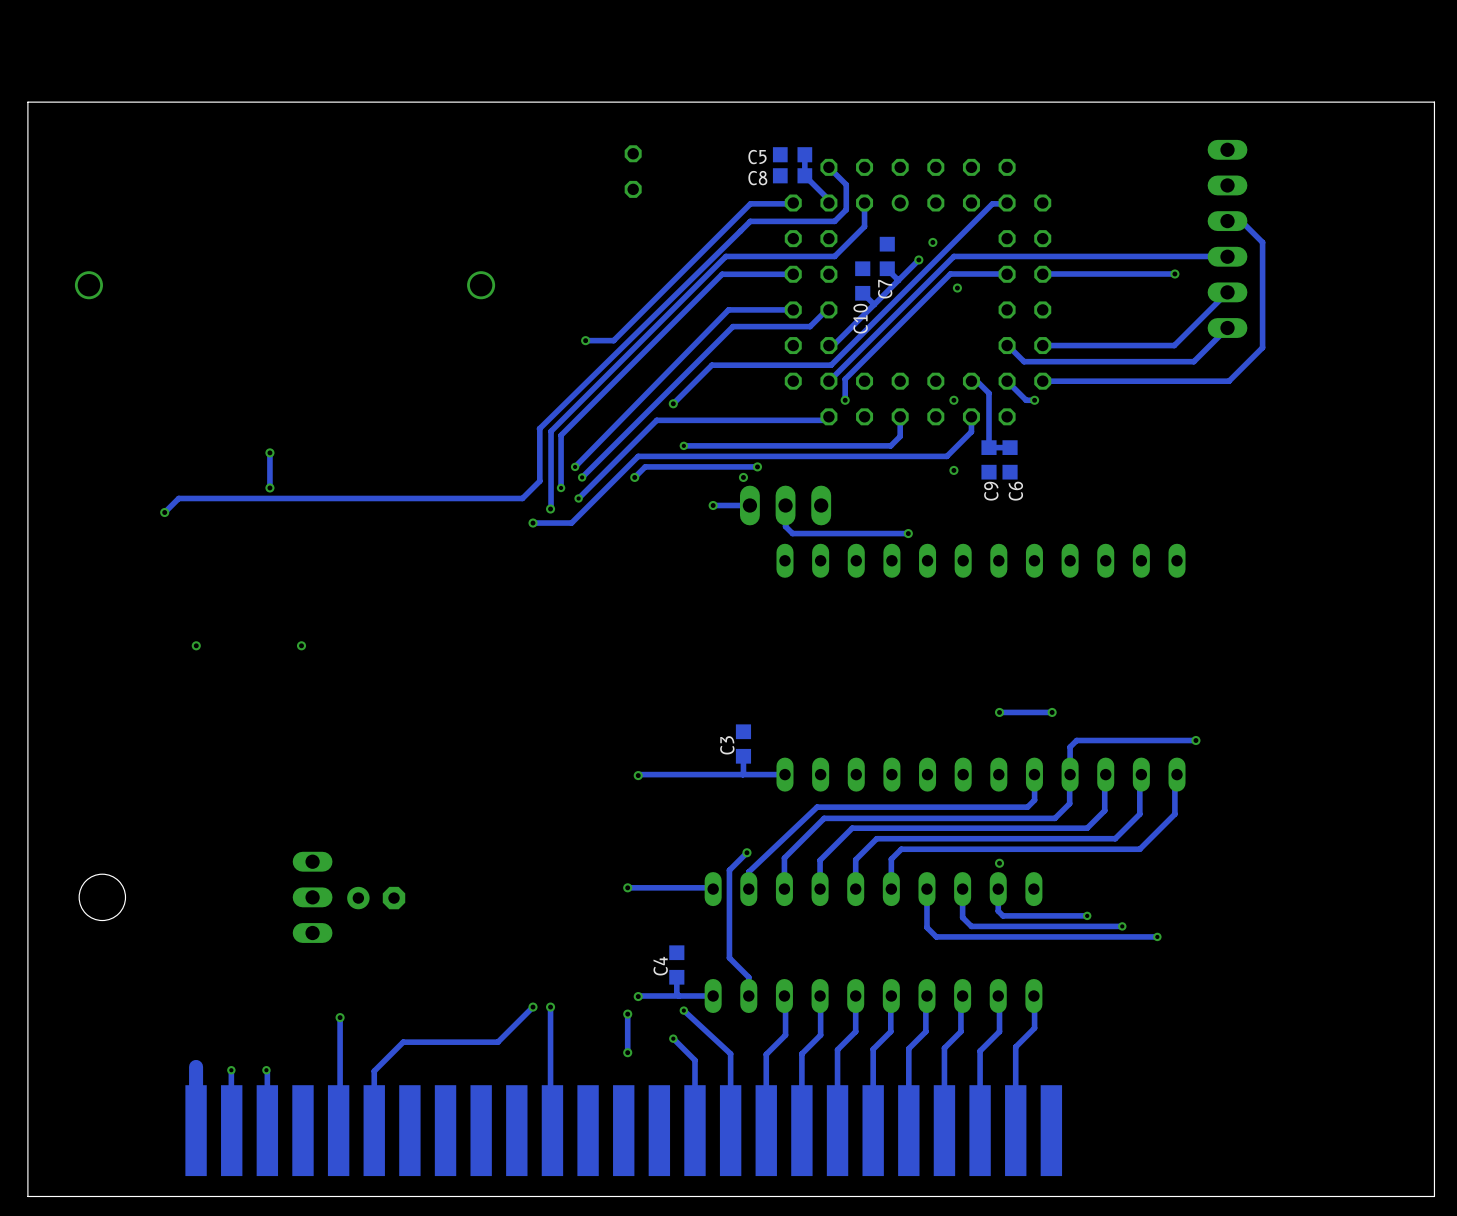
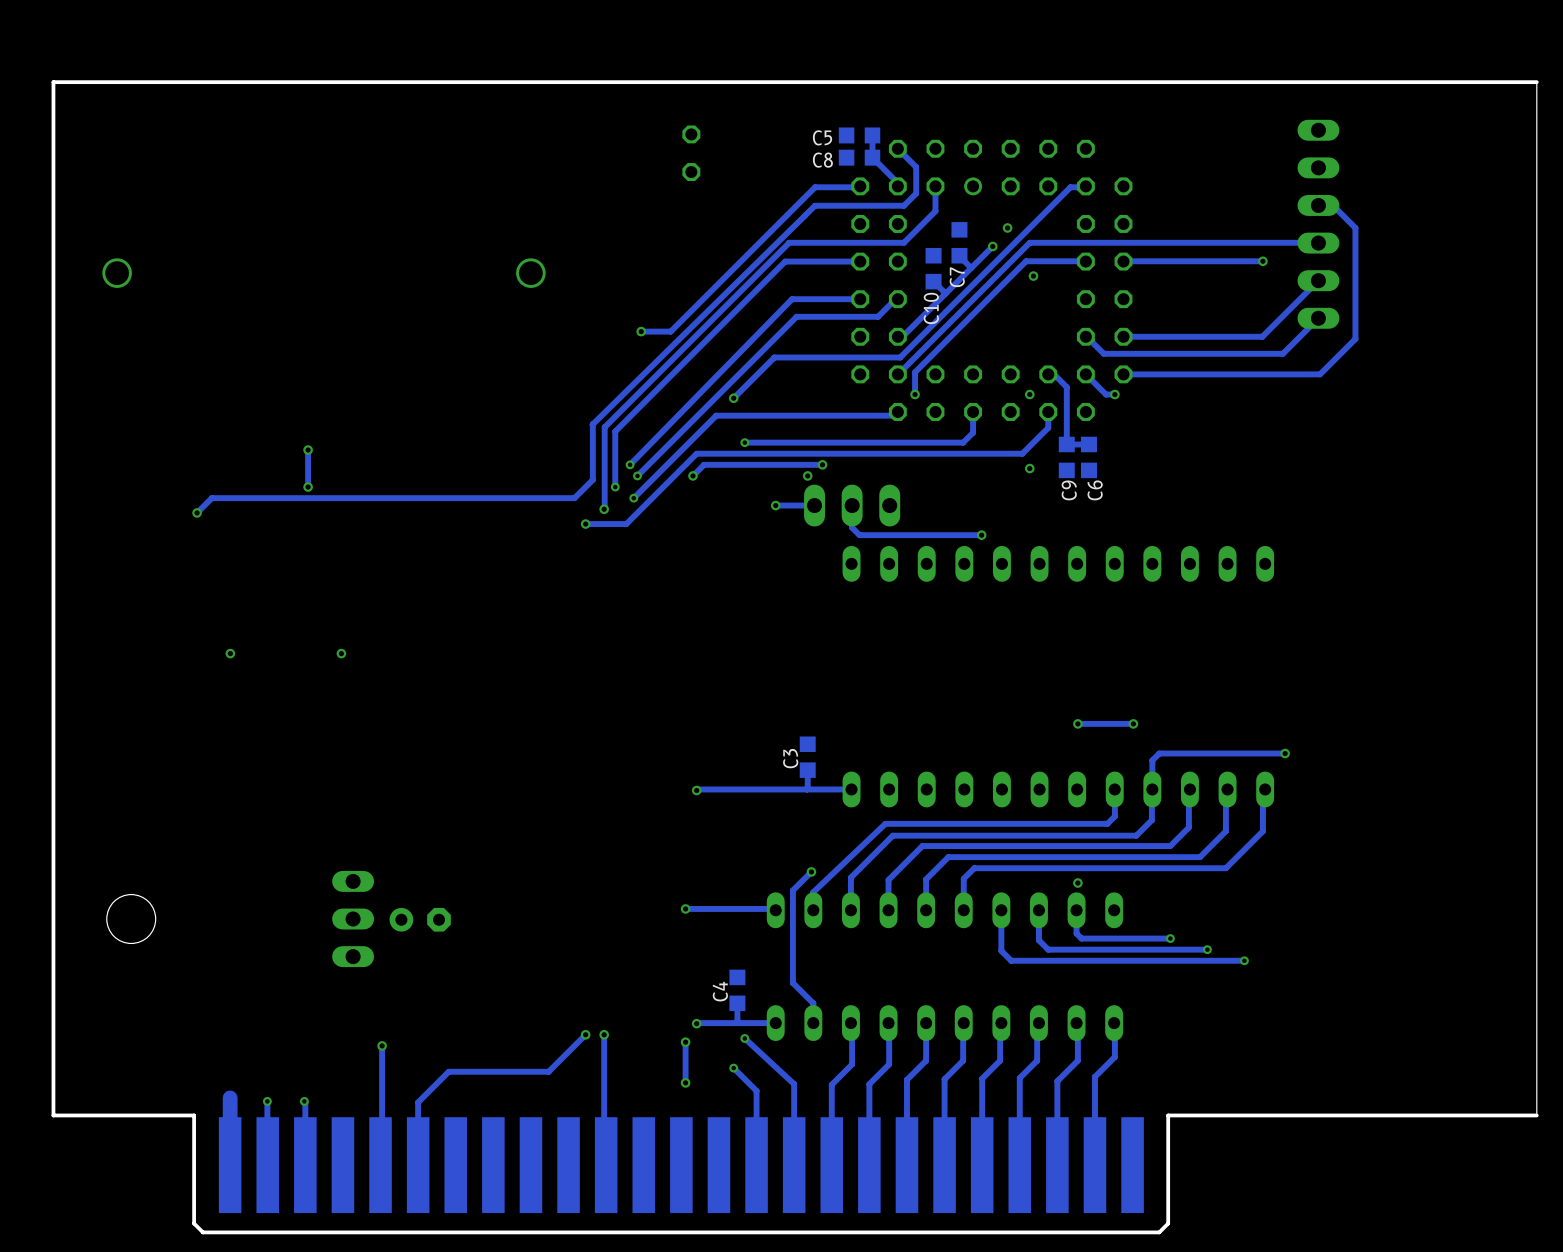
board edge: (1434, 104) (1434, 102) (27, 102) (27, 1196) (1434, 1196) (1434, 1083) -> (1536, 82) (53, 82) (53, 1115) (194, 1115) (194, 1223) (202, 1232) (1159, 1232) (1168, 1223) (1168, 1115) (1536, 1115)

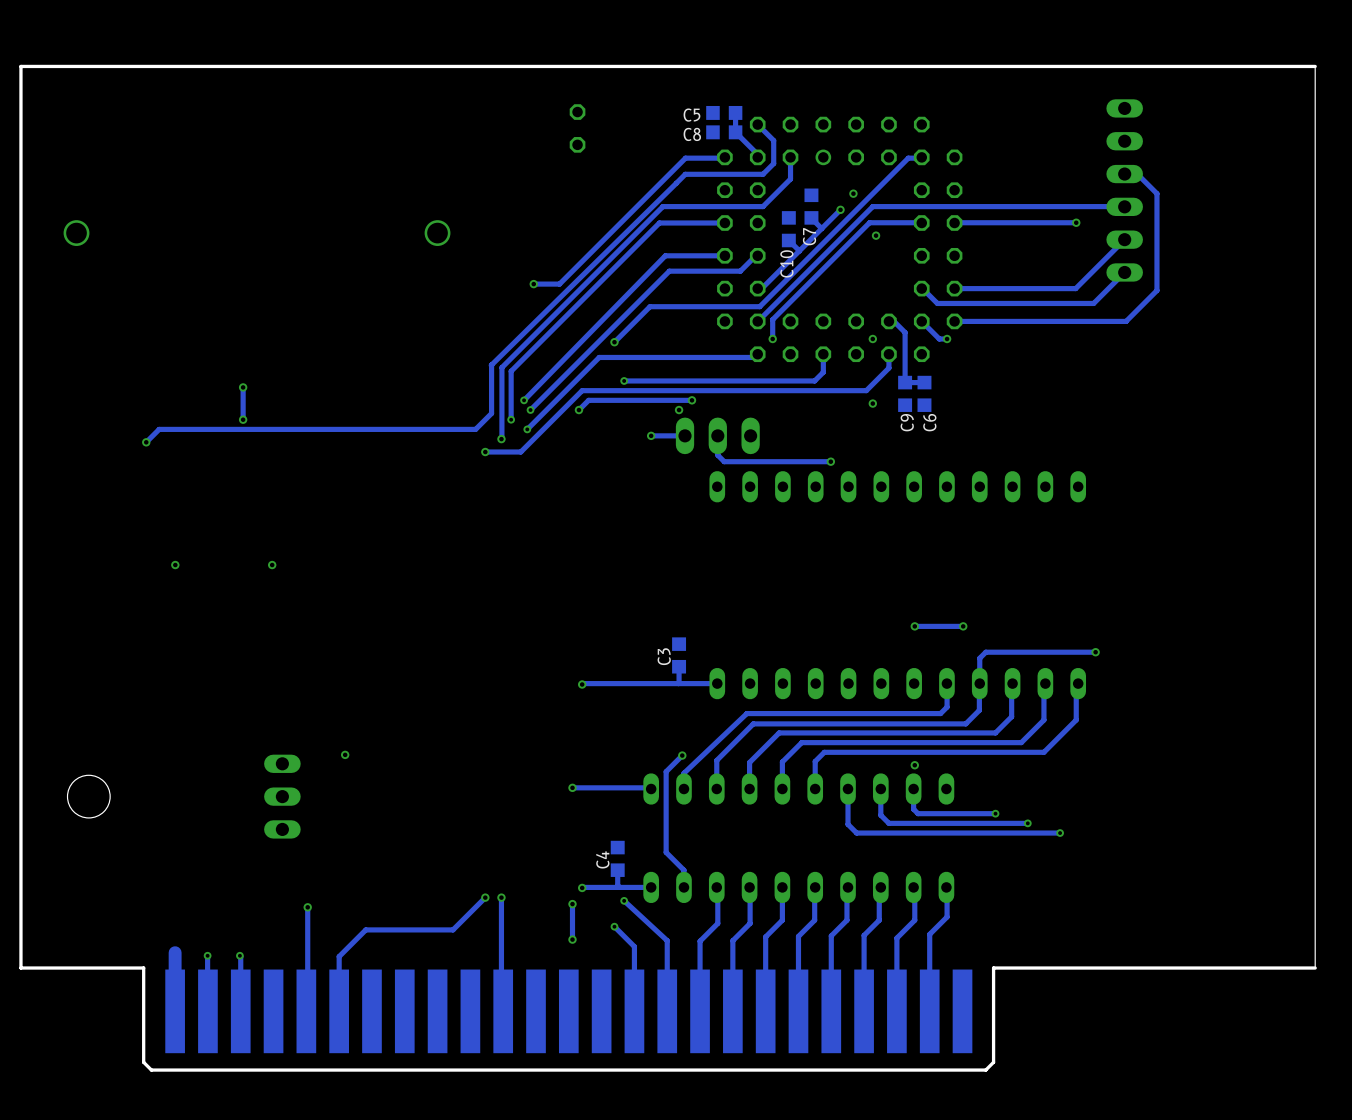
via: none -> (345, 754)
part: (420, 919) -> none

